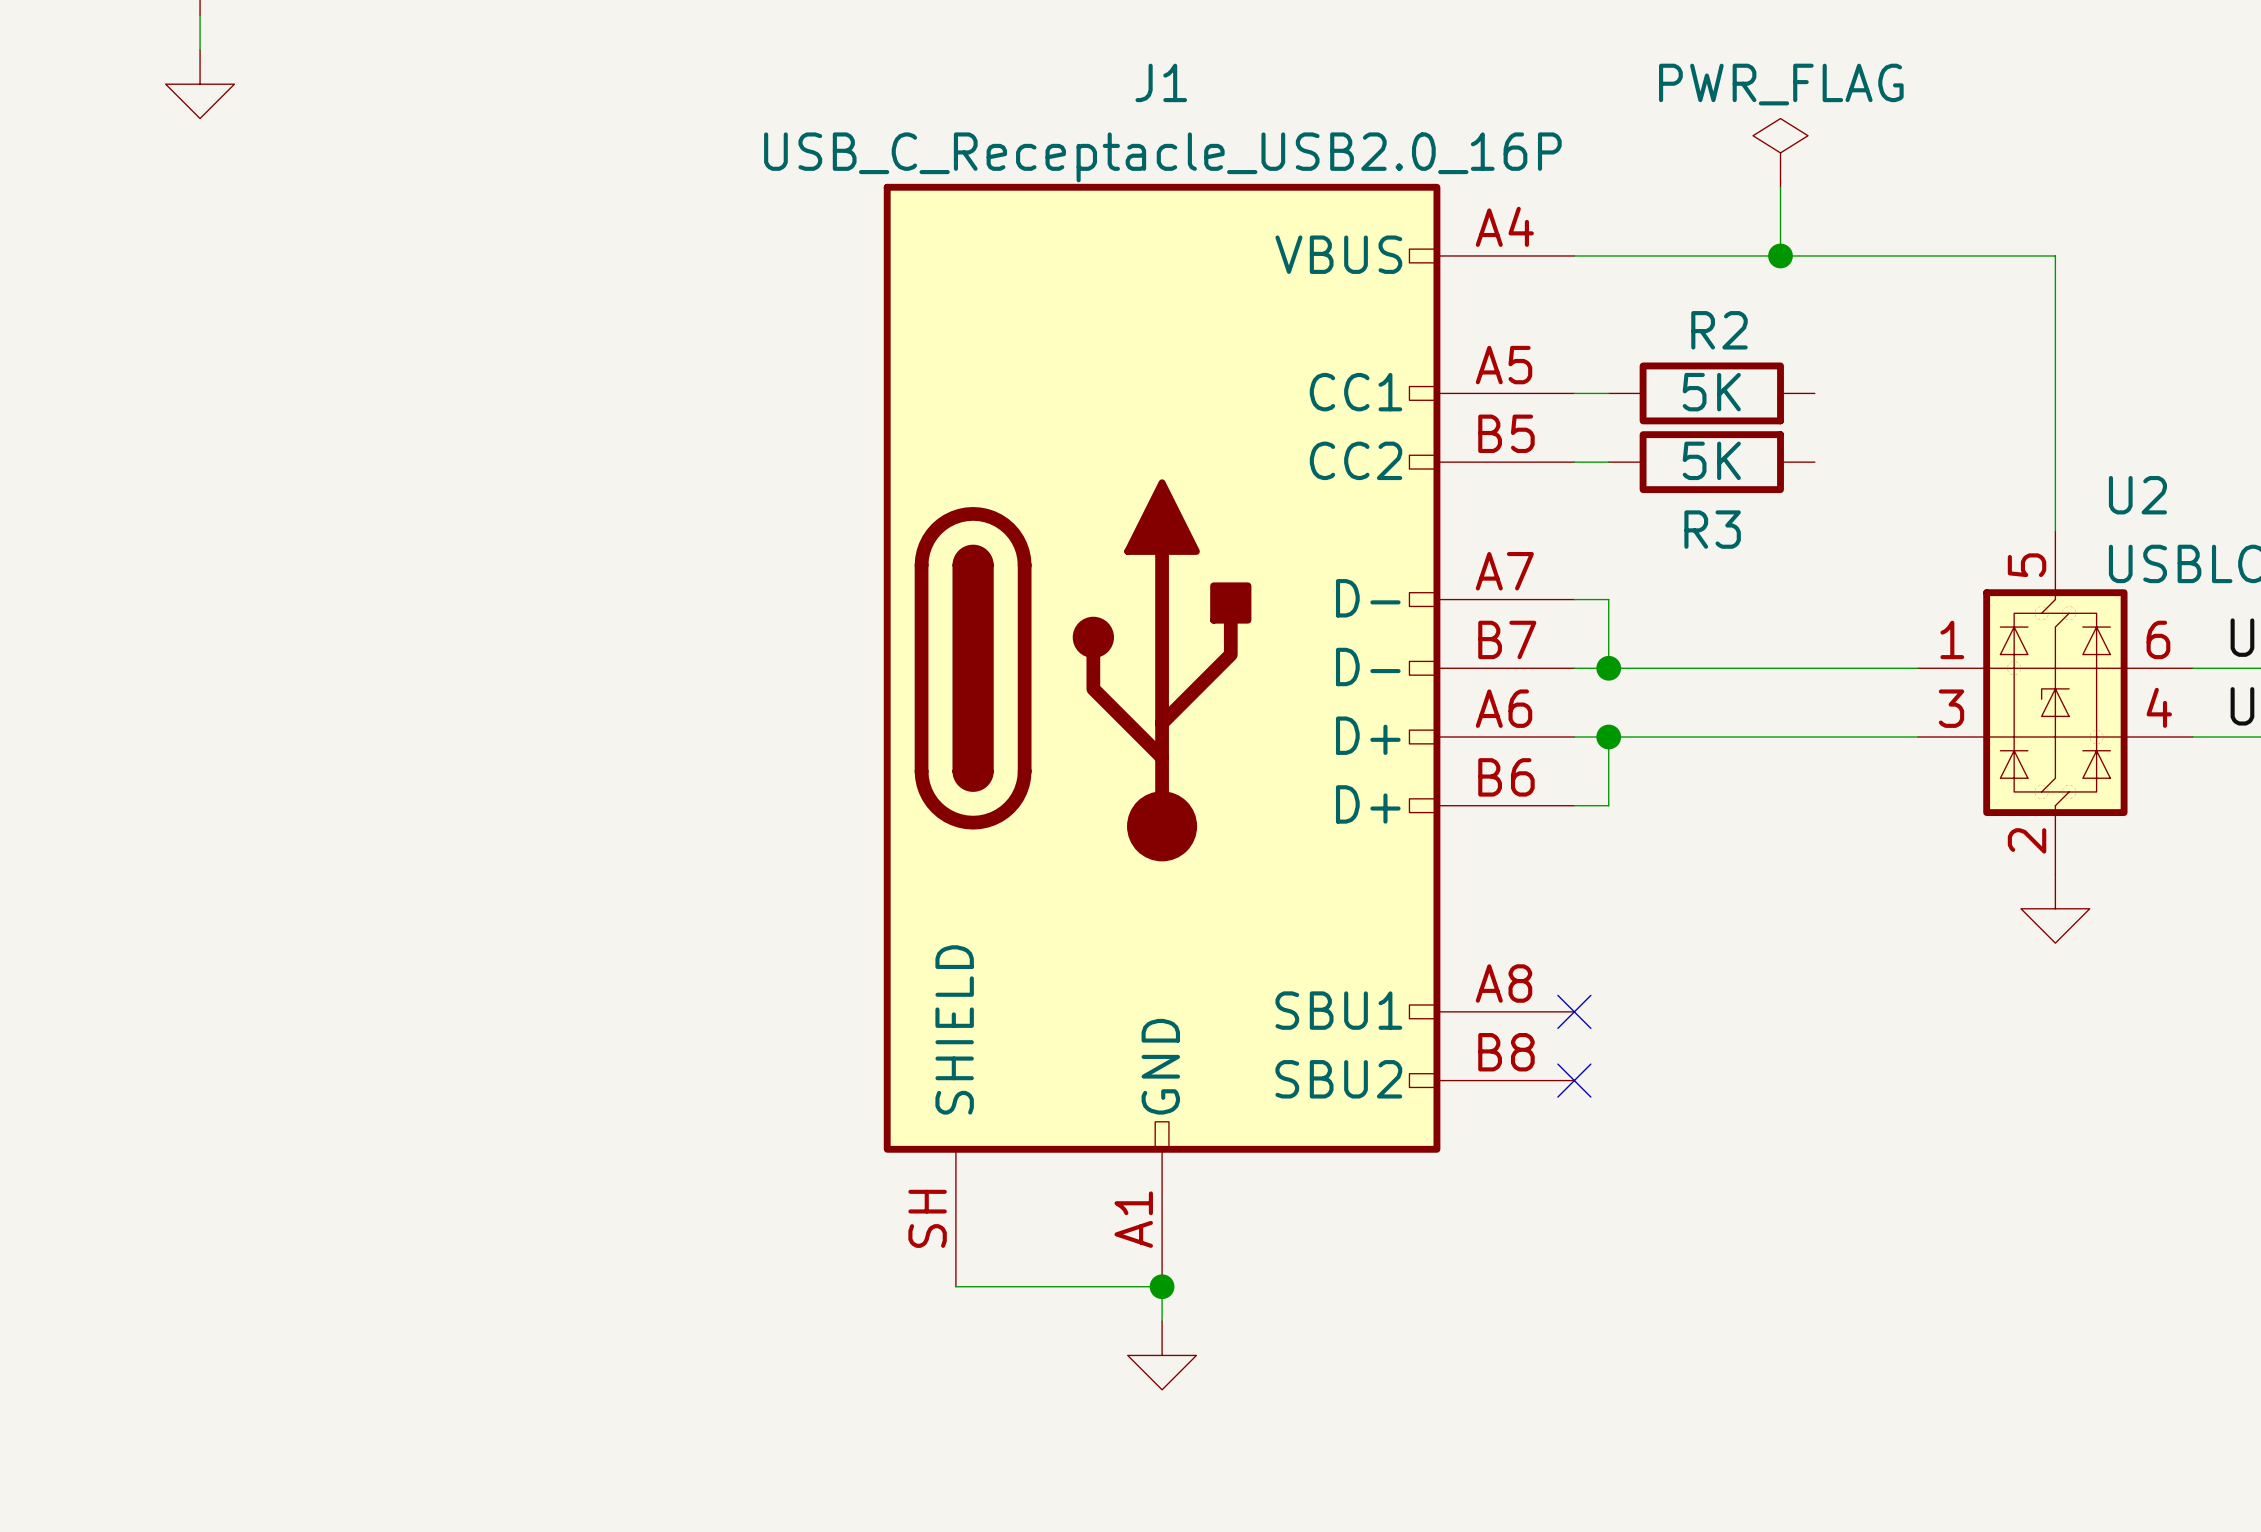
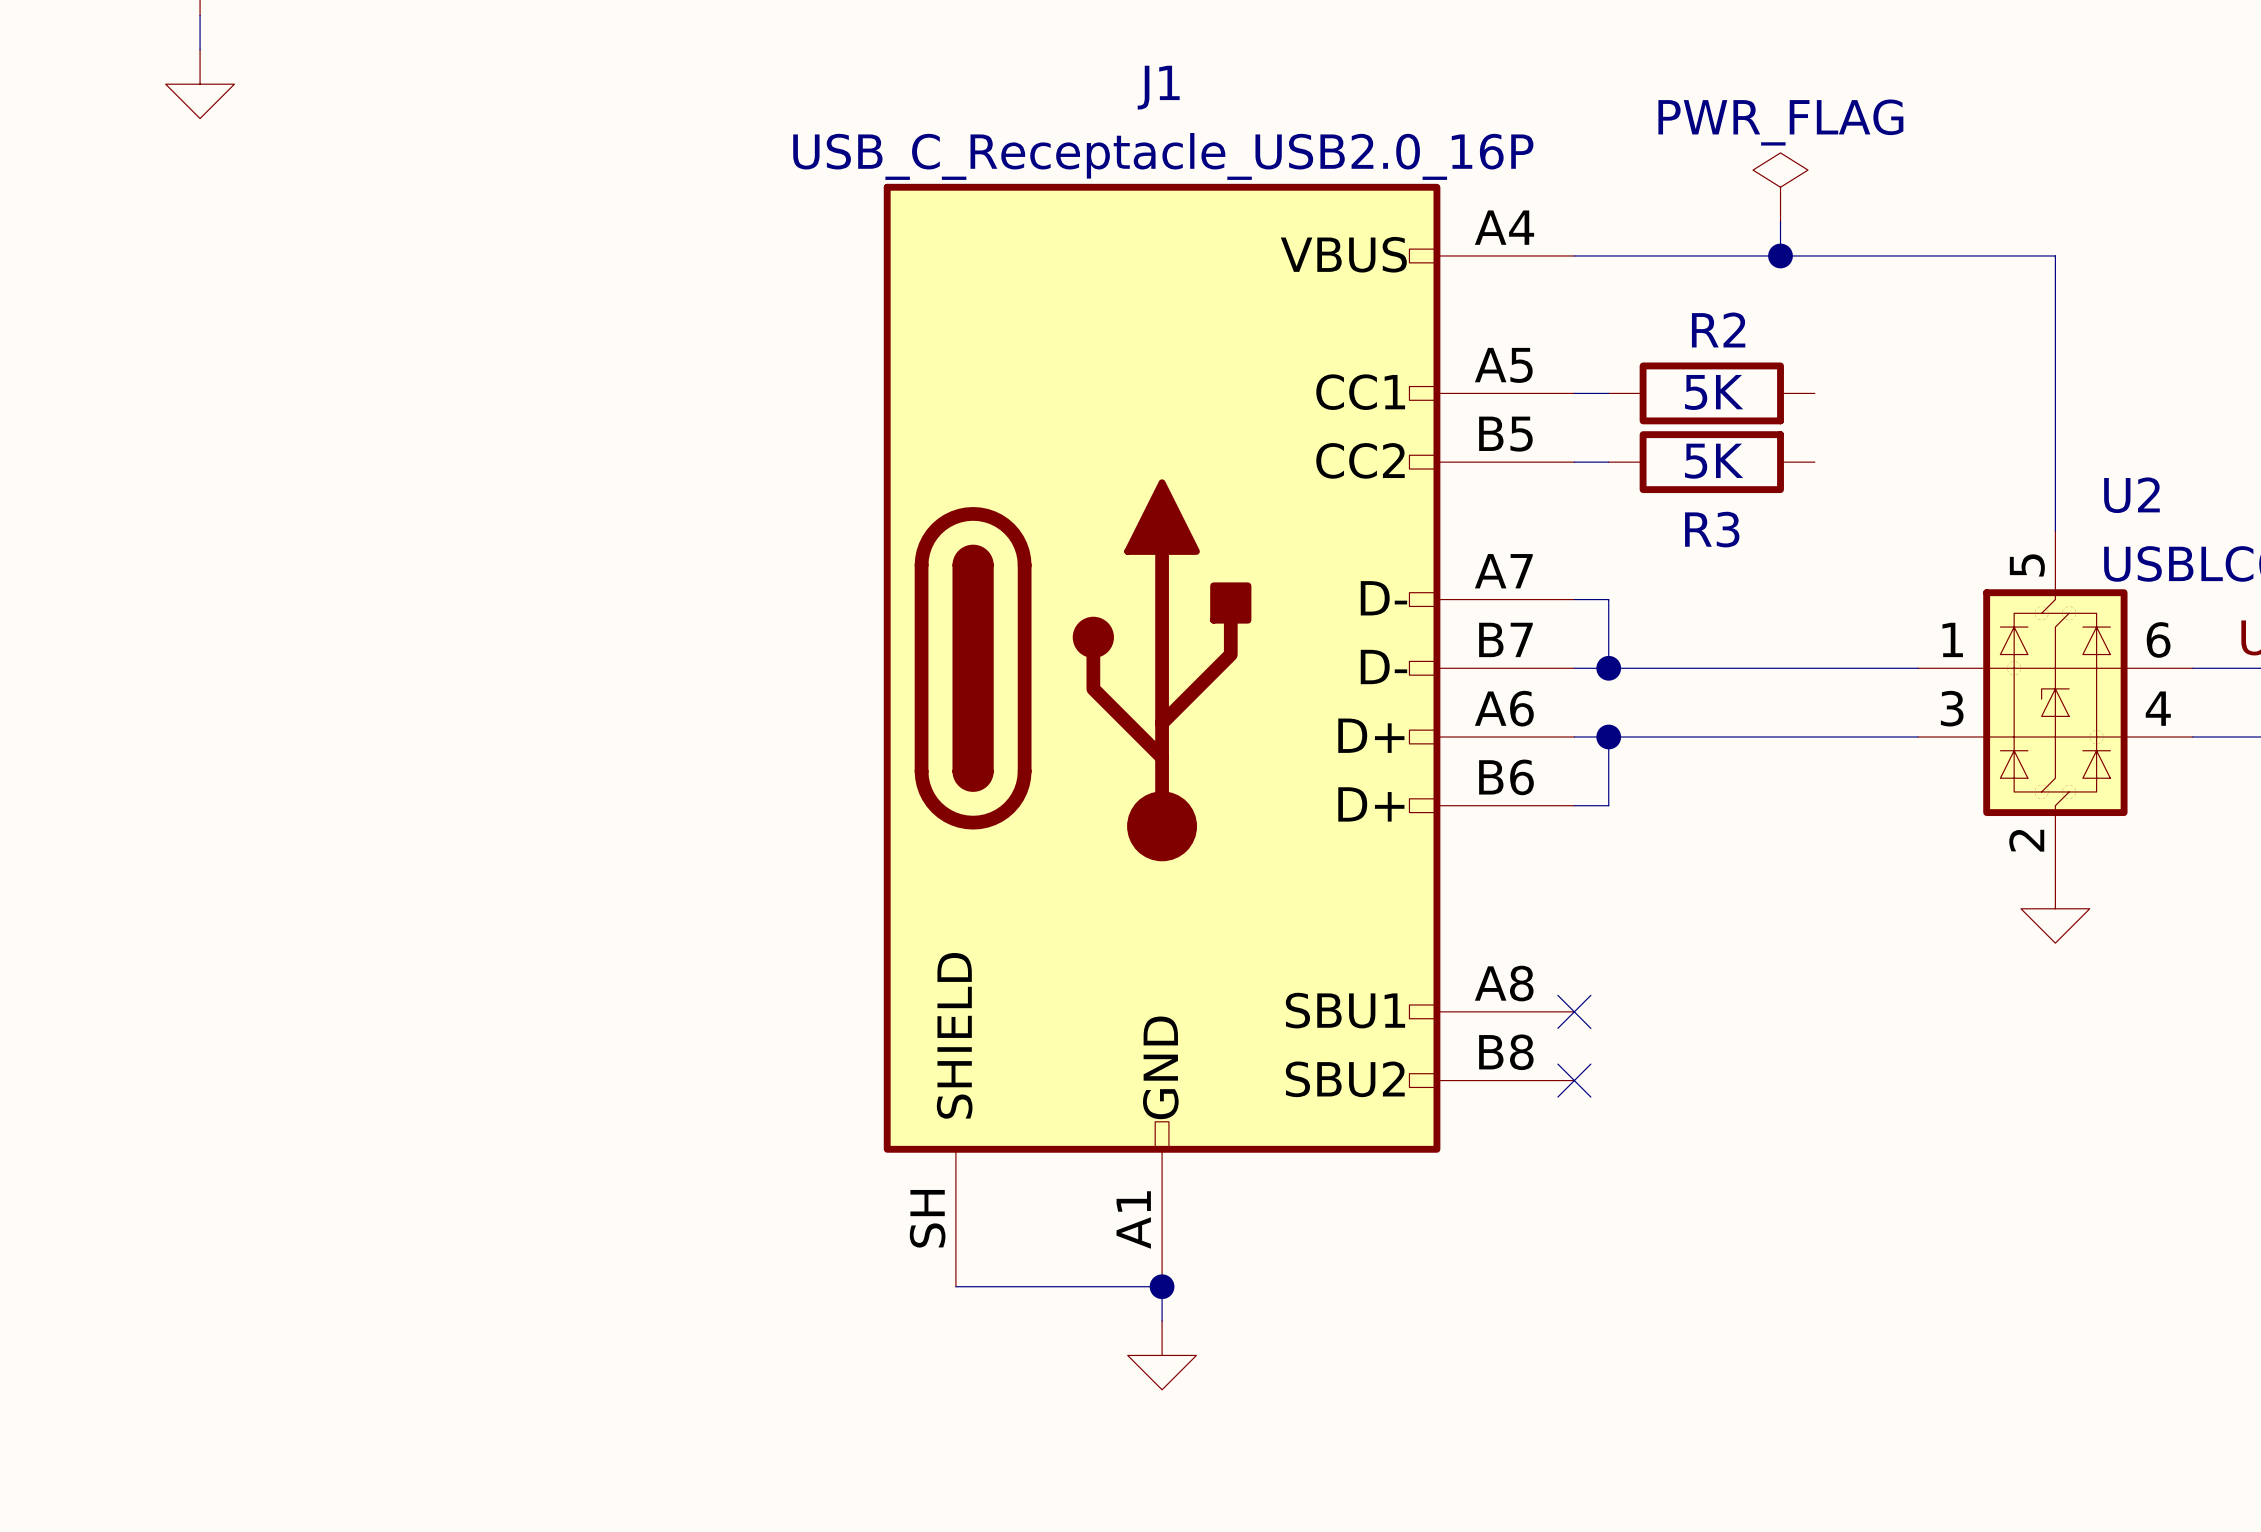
power symbol position: PWR_FLAG (1780, 152) -> PWR_FLAG (1780, 187)

